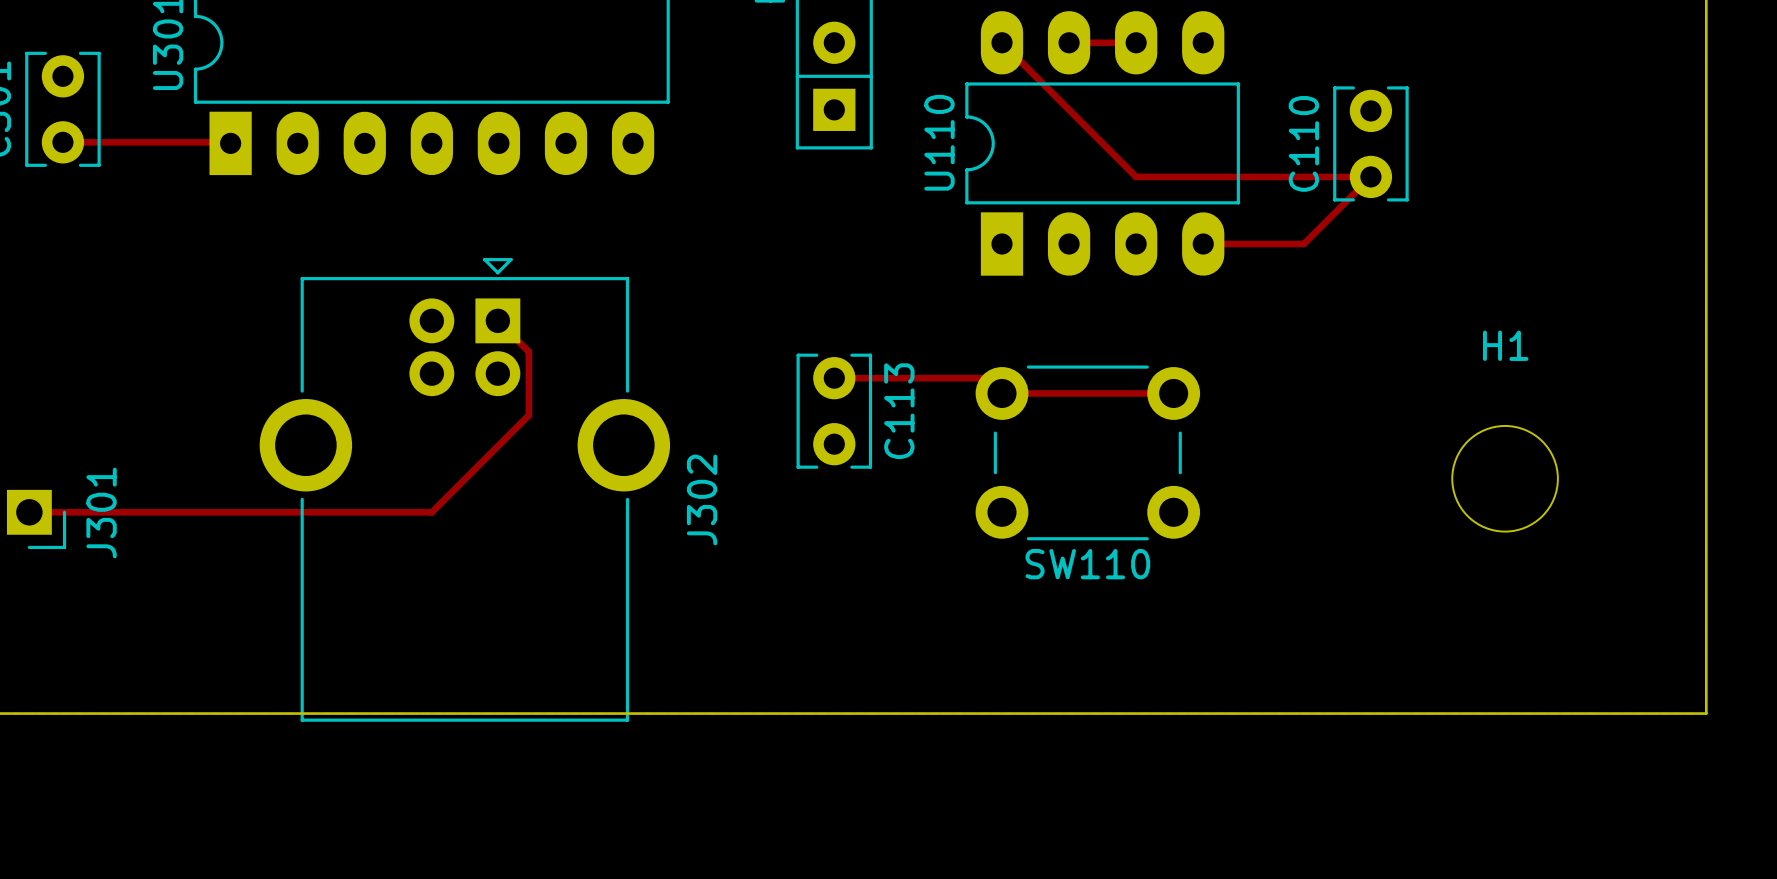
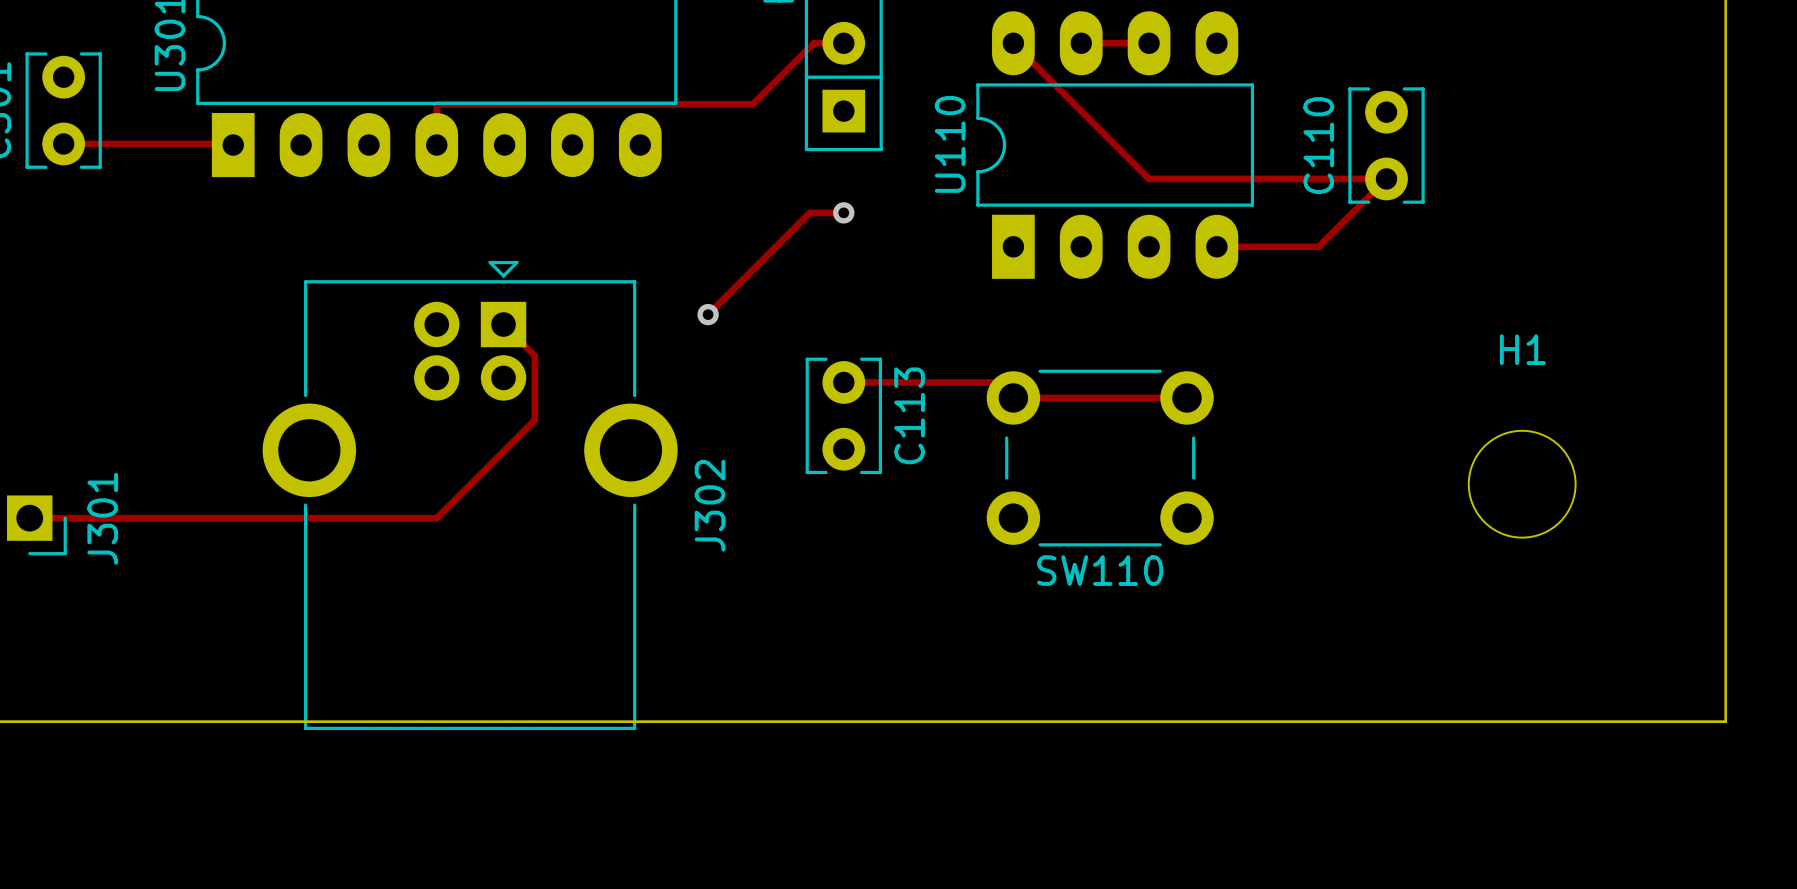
track: none -> (843, 43) (813, 43) (752, 104) (436, 104) (436, 145)
track: none -> (843, 212) (809, 212) (708, 314)
via: none -> (843, 212)
via: none -> (708, 314)

